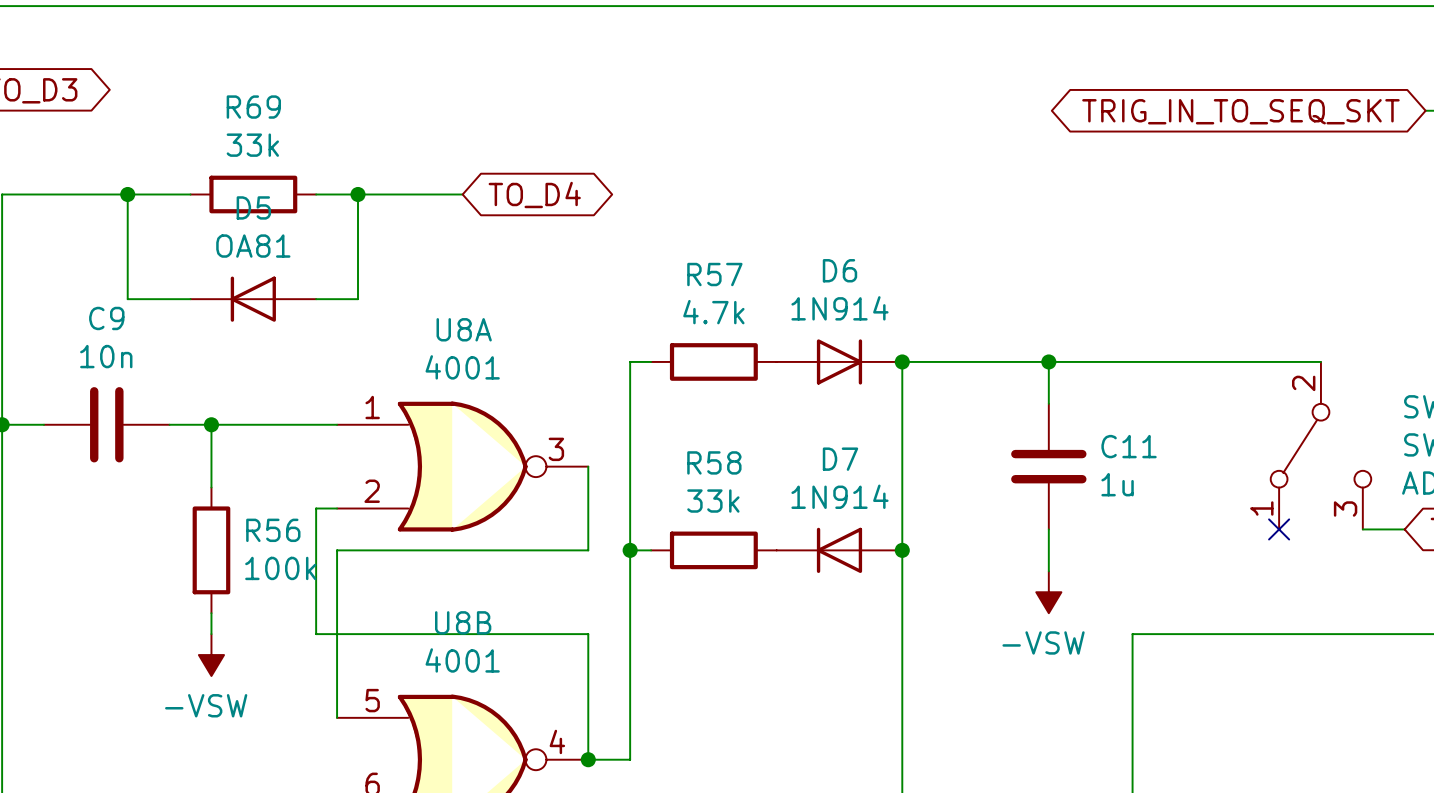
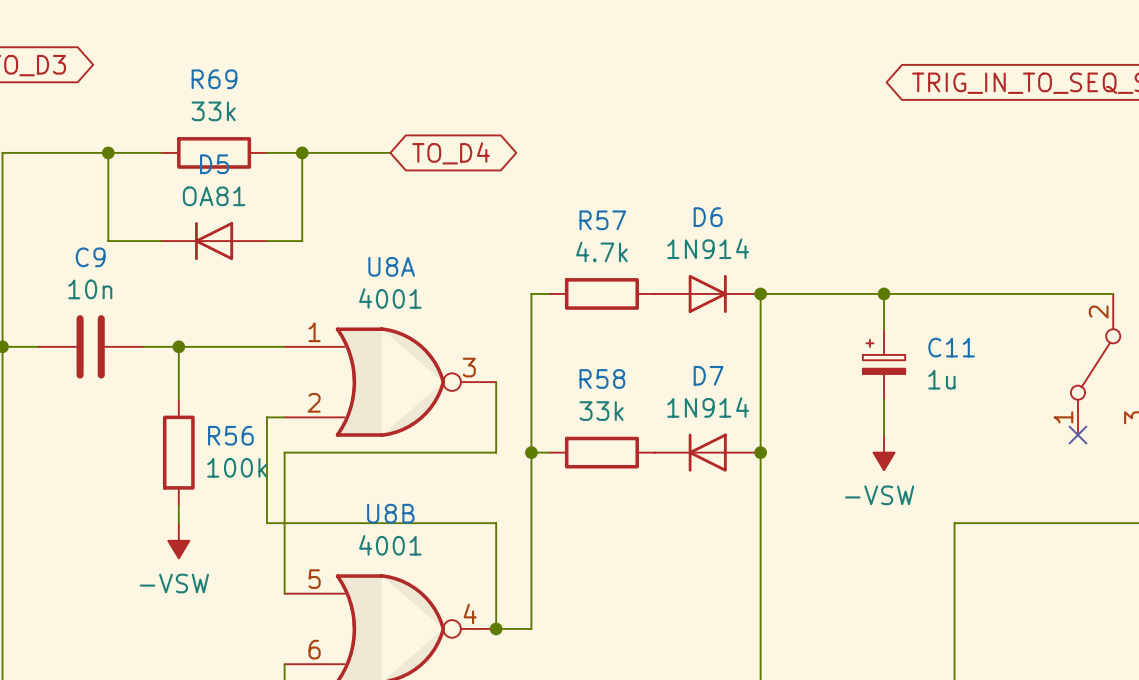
C11 symbol: [1011, 403, 1087, 530] -> [862, 329, 906, 400]
power symbol position: -VSW (1048, 592) -> -VSW (884, 452)

